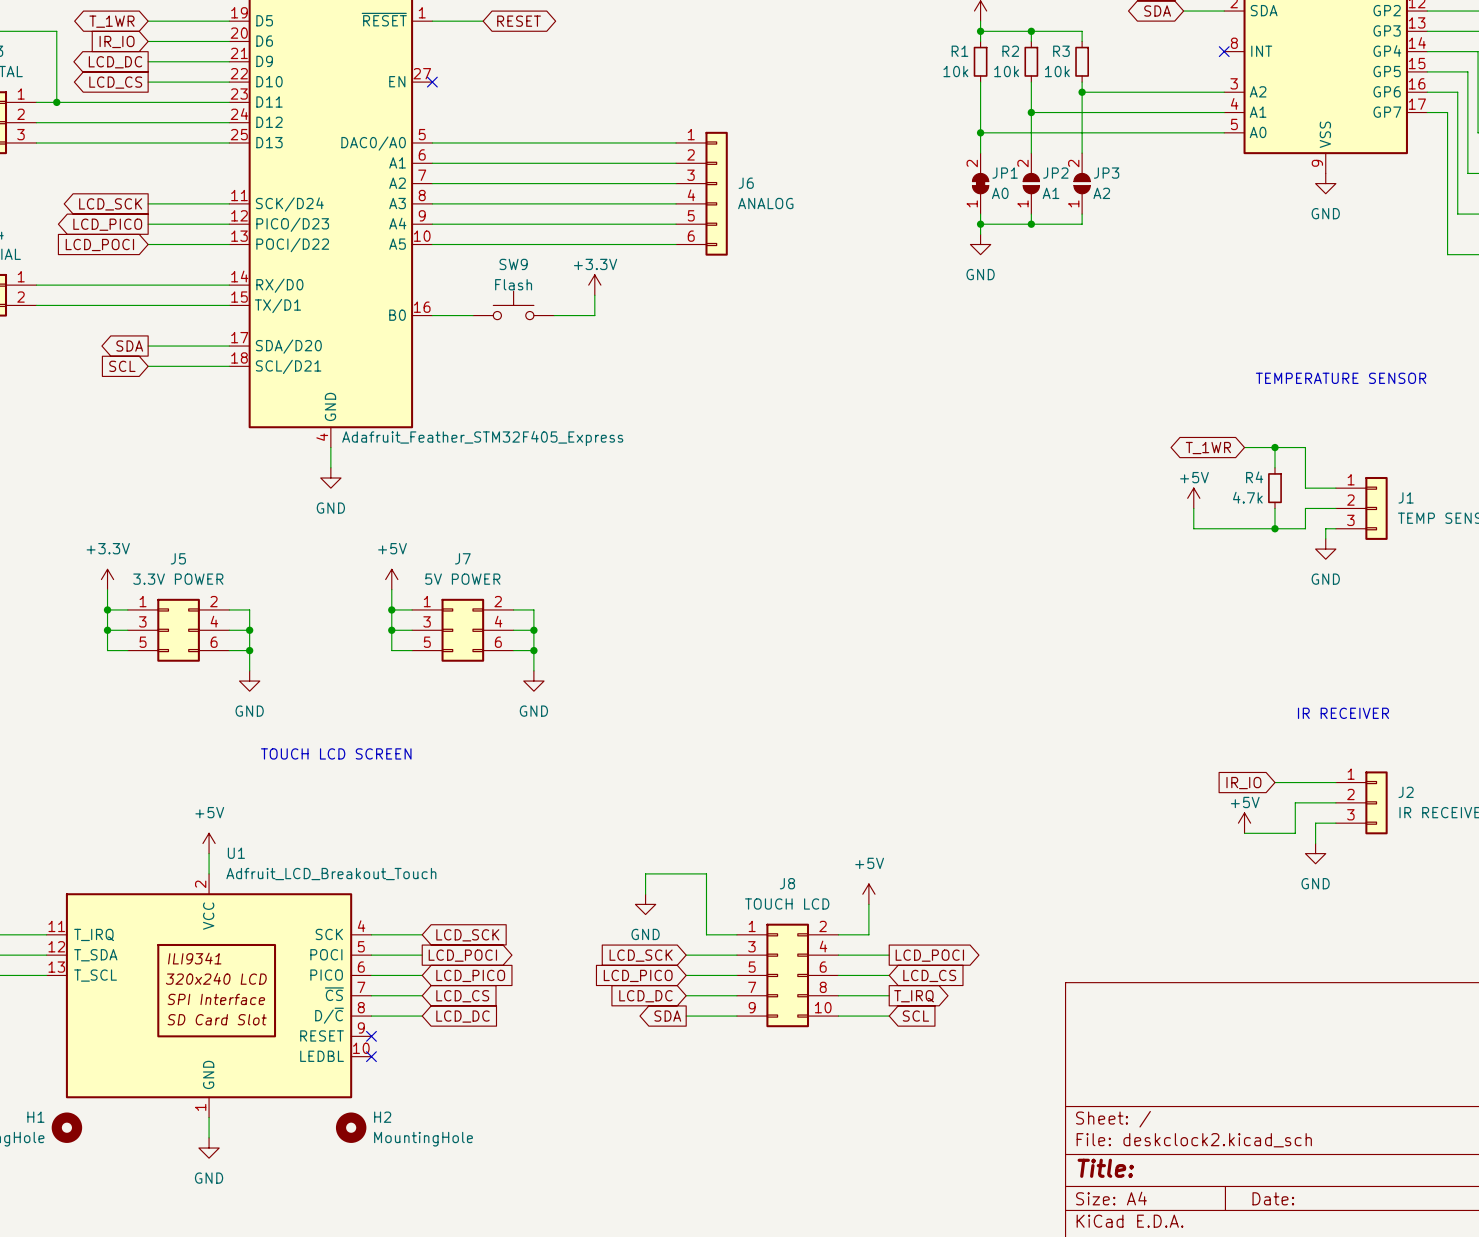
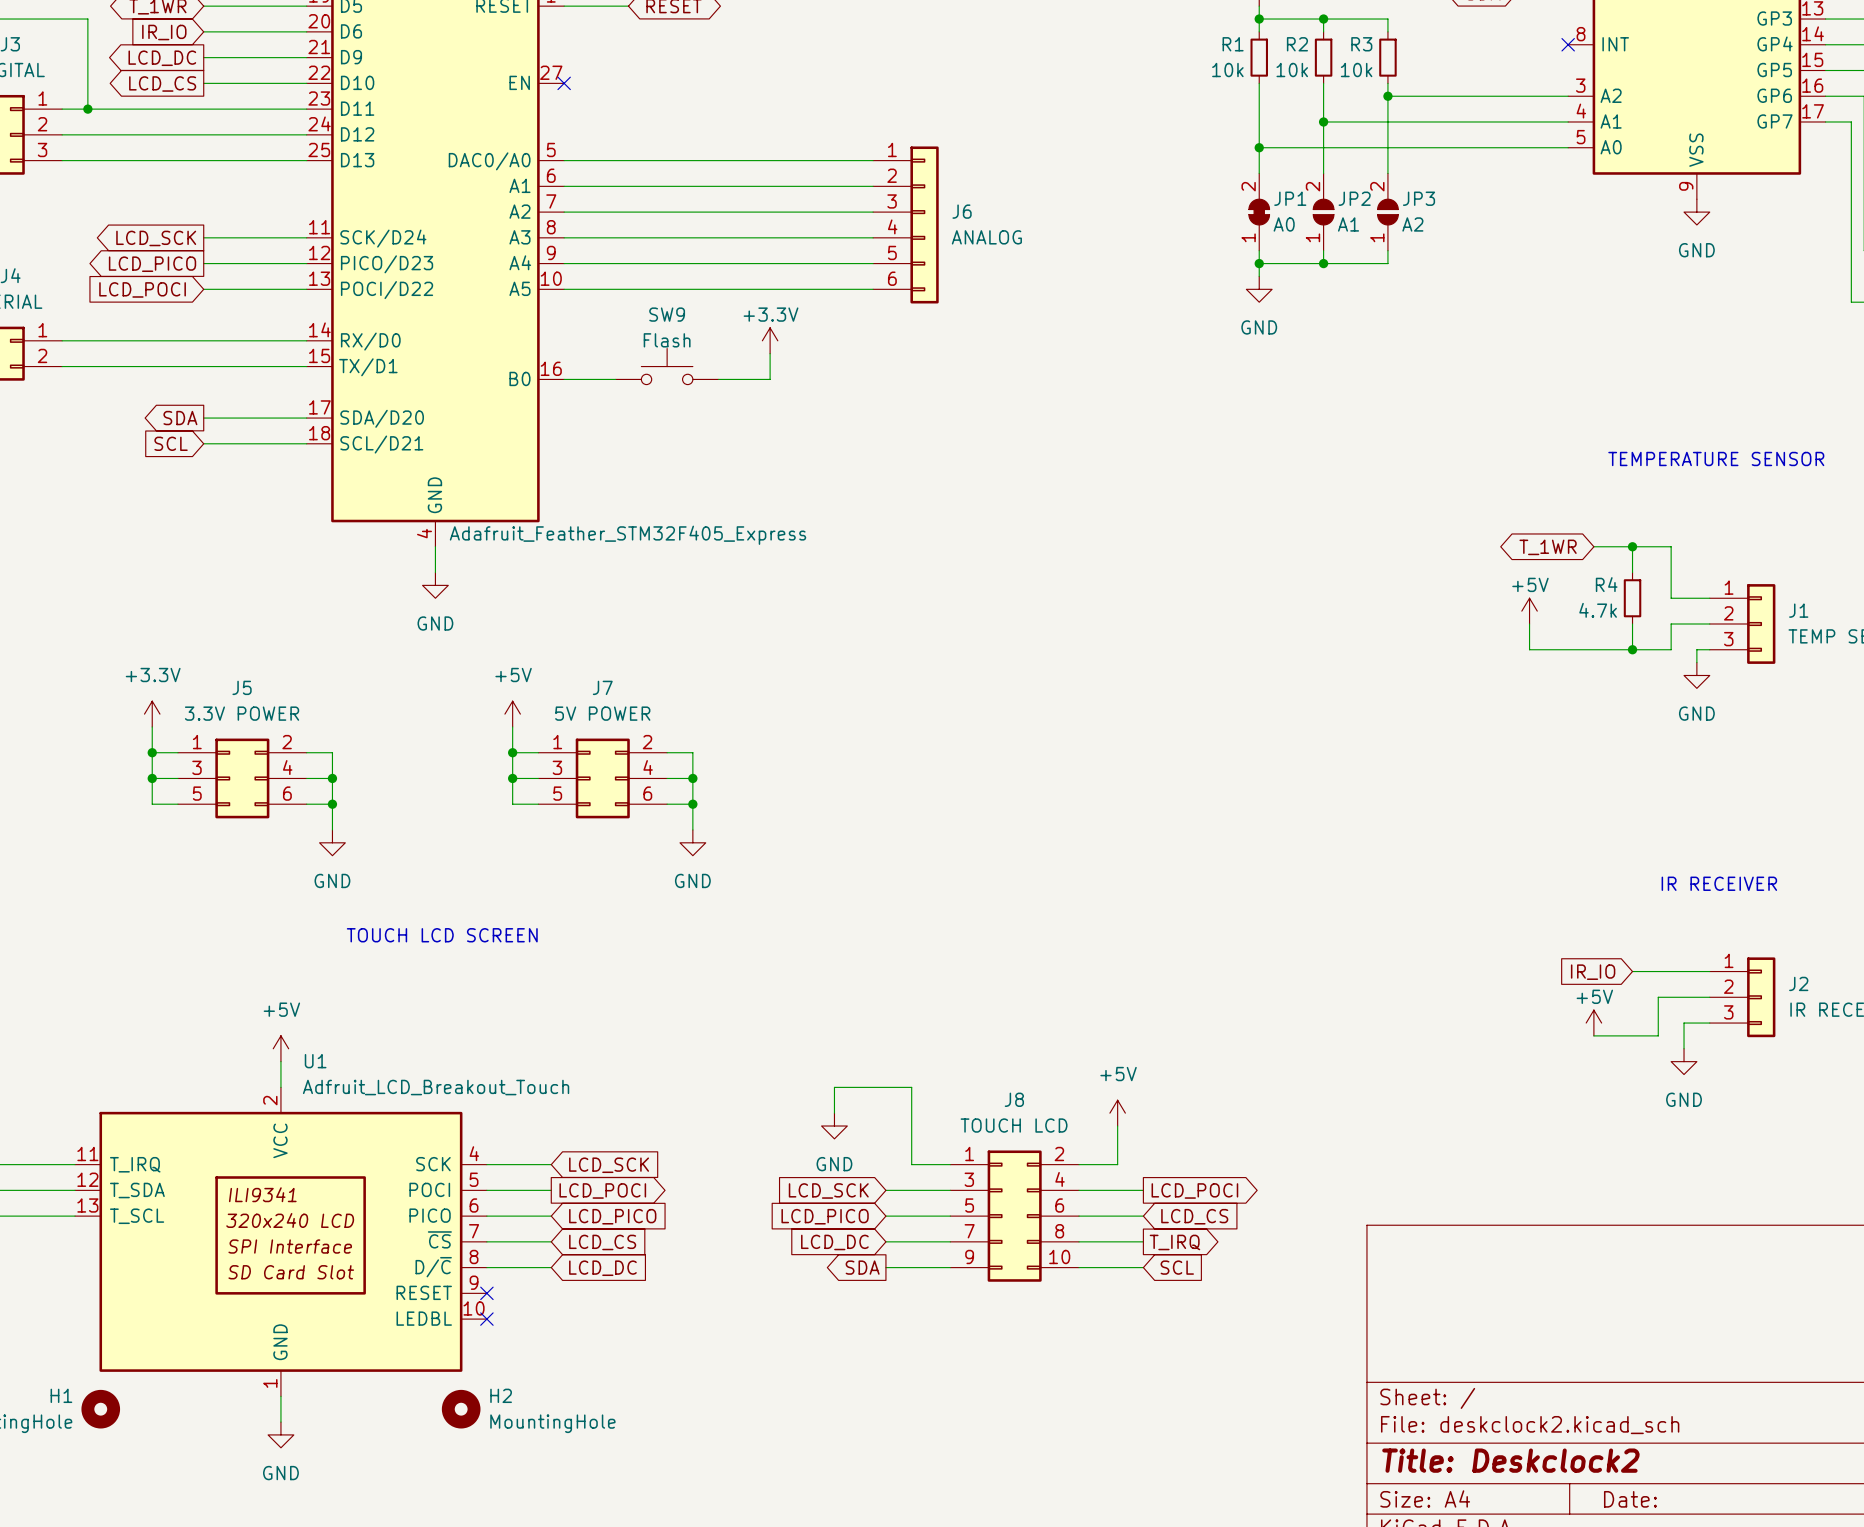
title block: Title: (1105, 1168) -> Title: Deskclock2 (1510, 1460)

